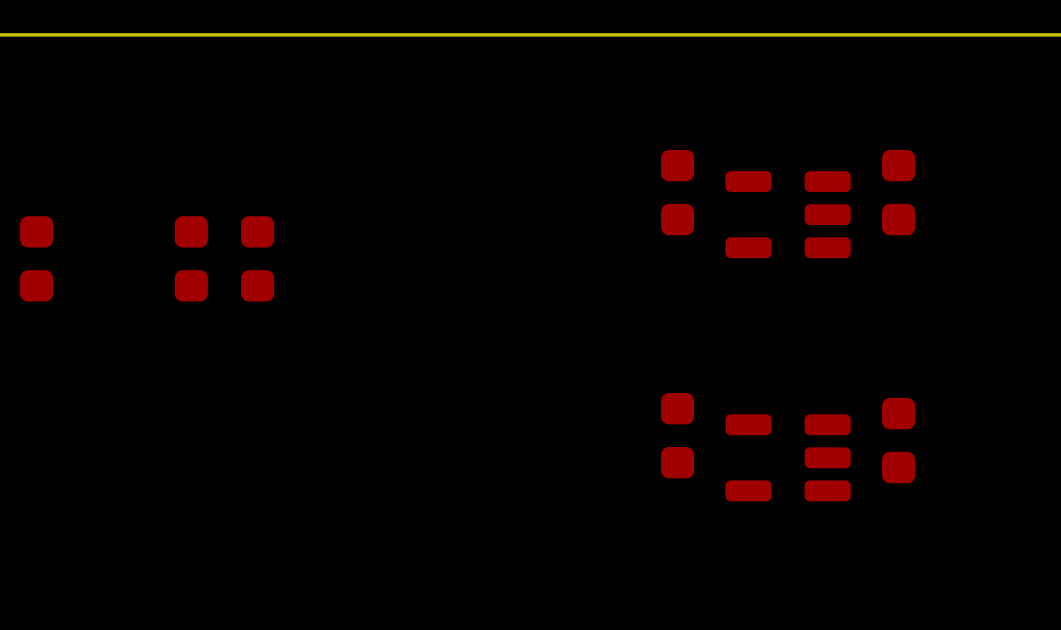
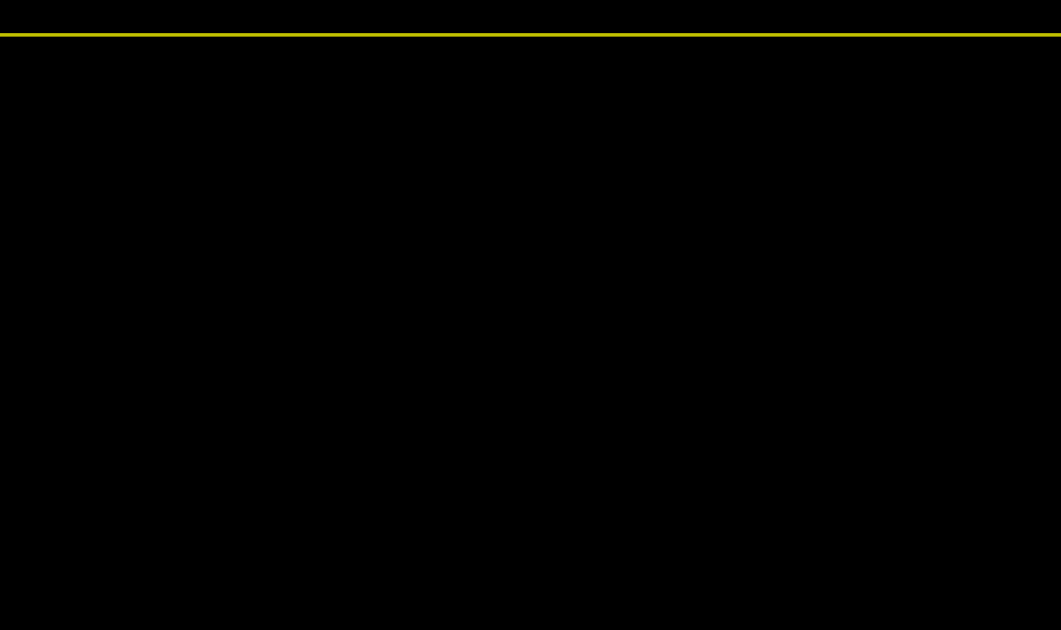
part: (677, 192) -> none
part: (898, 192) -> none
part: (788, 214) -> none
part: (36, 258) -> none
part: (191, 258) -> none
part: (257, 258) -> none
part: (677, 435) -> none
part: (898, 440) -> none
part: (788, 457) -> none

